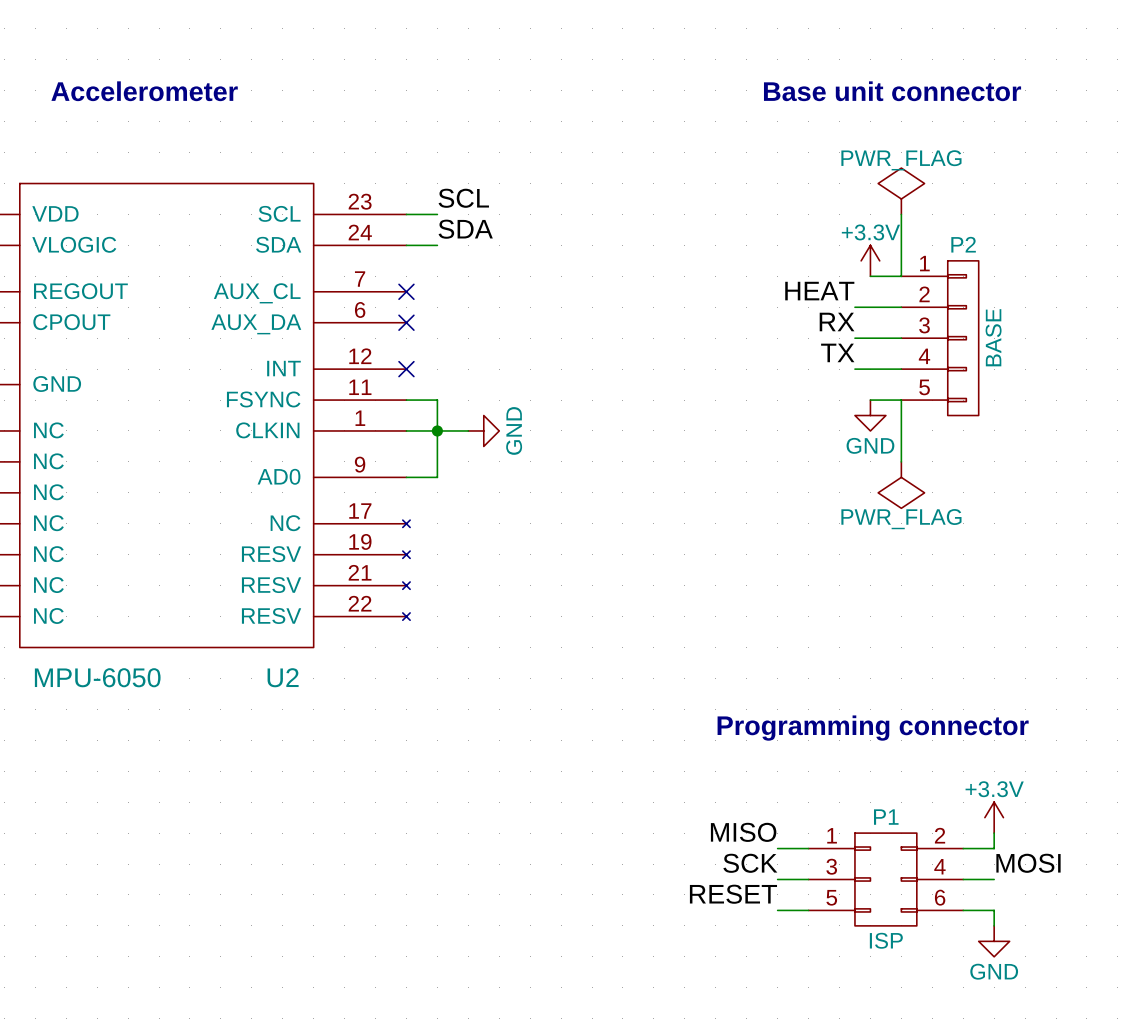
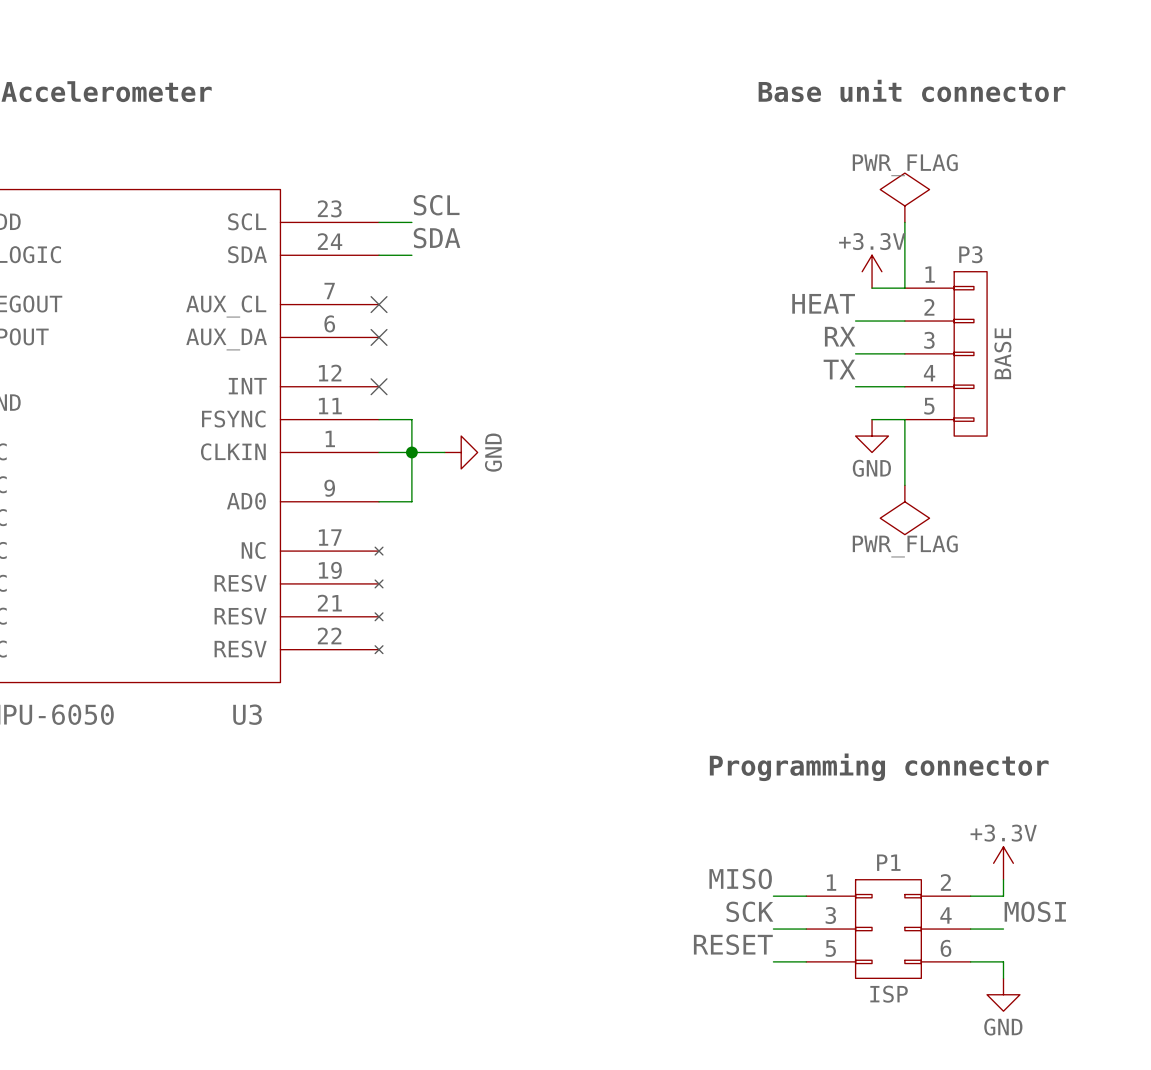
P2 name: P2 (963, 244) -> P3 (970, 254)
U2 name: U2 (283, 677) -> U3 (247, 714)

